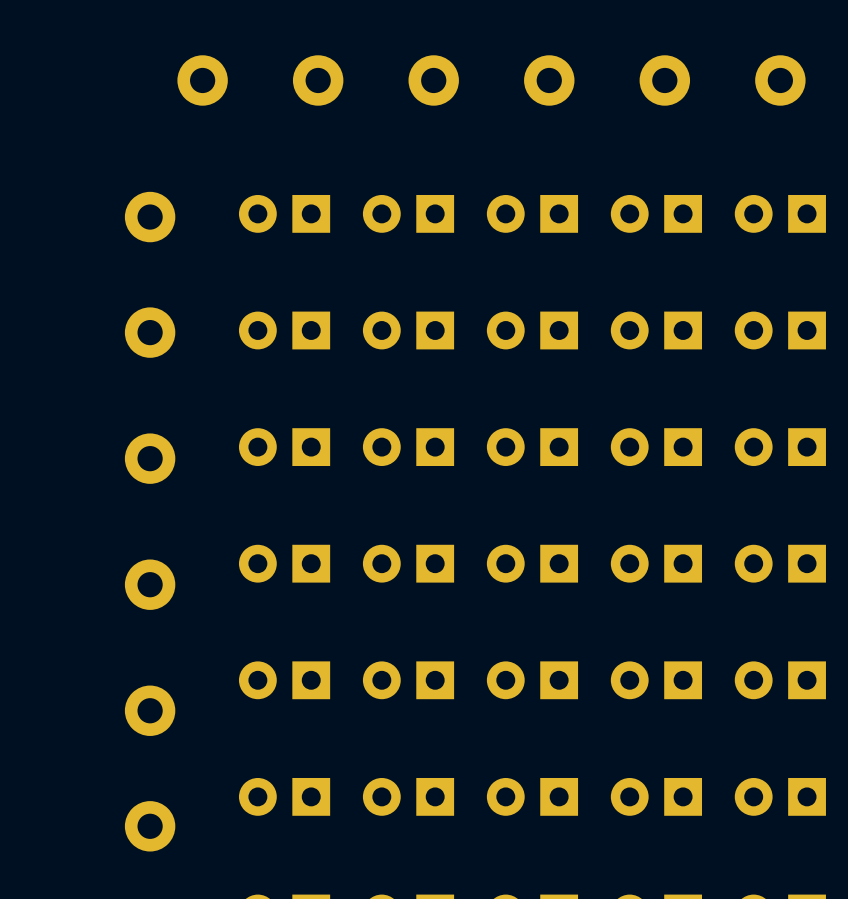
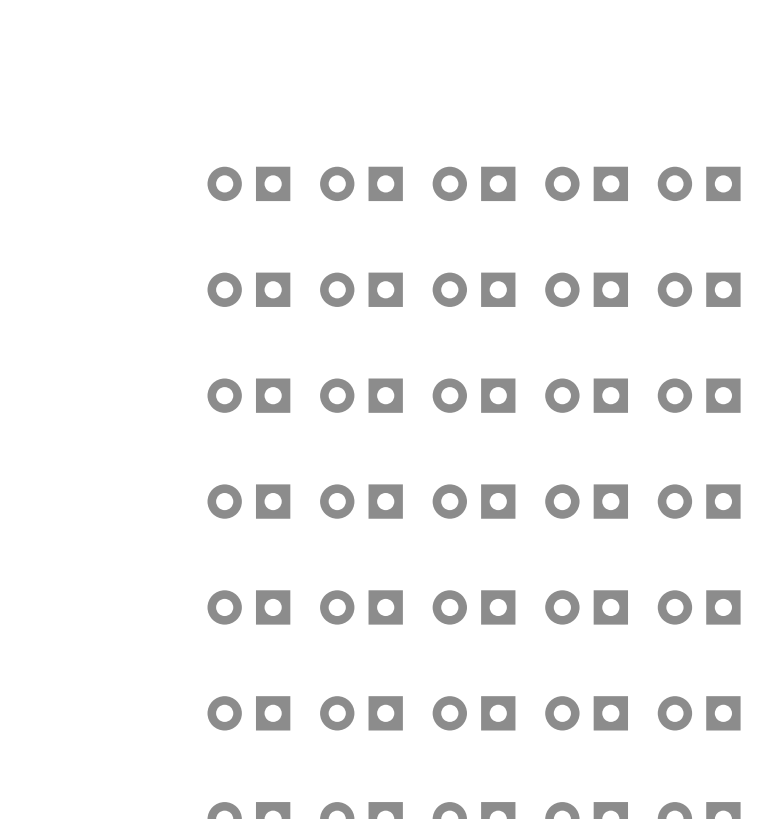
part: (202, 80) -> none
part: (318, 80) -> none
part: (433, 80) -> none
part: (549, 80) -> none
part: (664, 80) -> none
part: (780, 80) -> none
part: (150, 217) -> none
part: (150, 332) -> none
part: (150, 458) -> none
part: (150, 584) -> none
part: (150, 710) -> none
part: (150, 826) -> none

